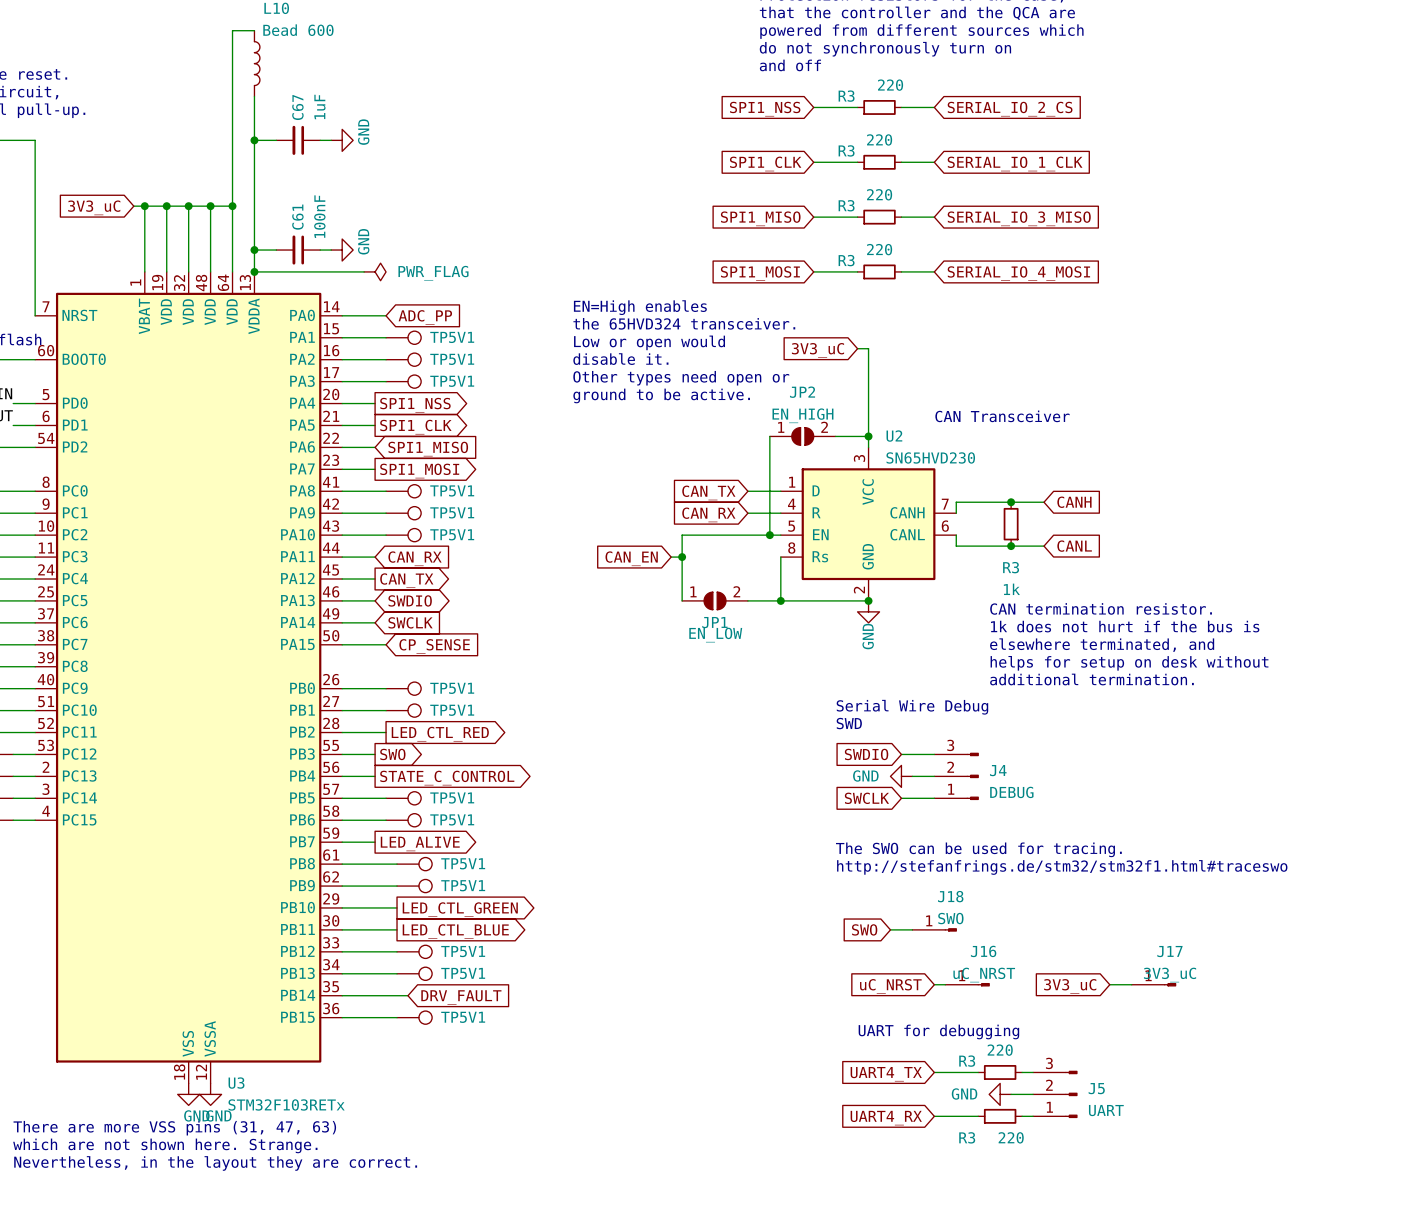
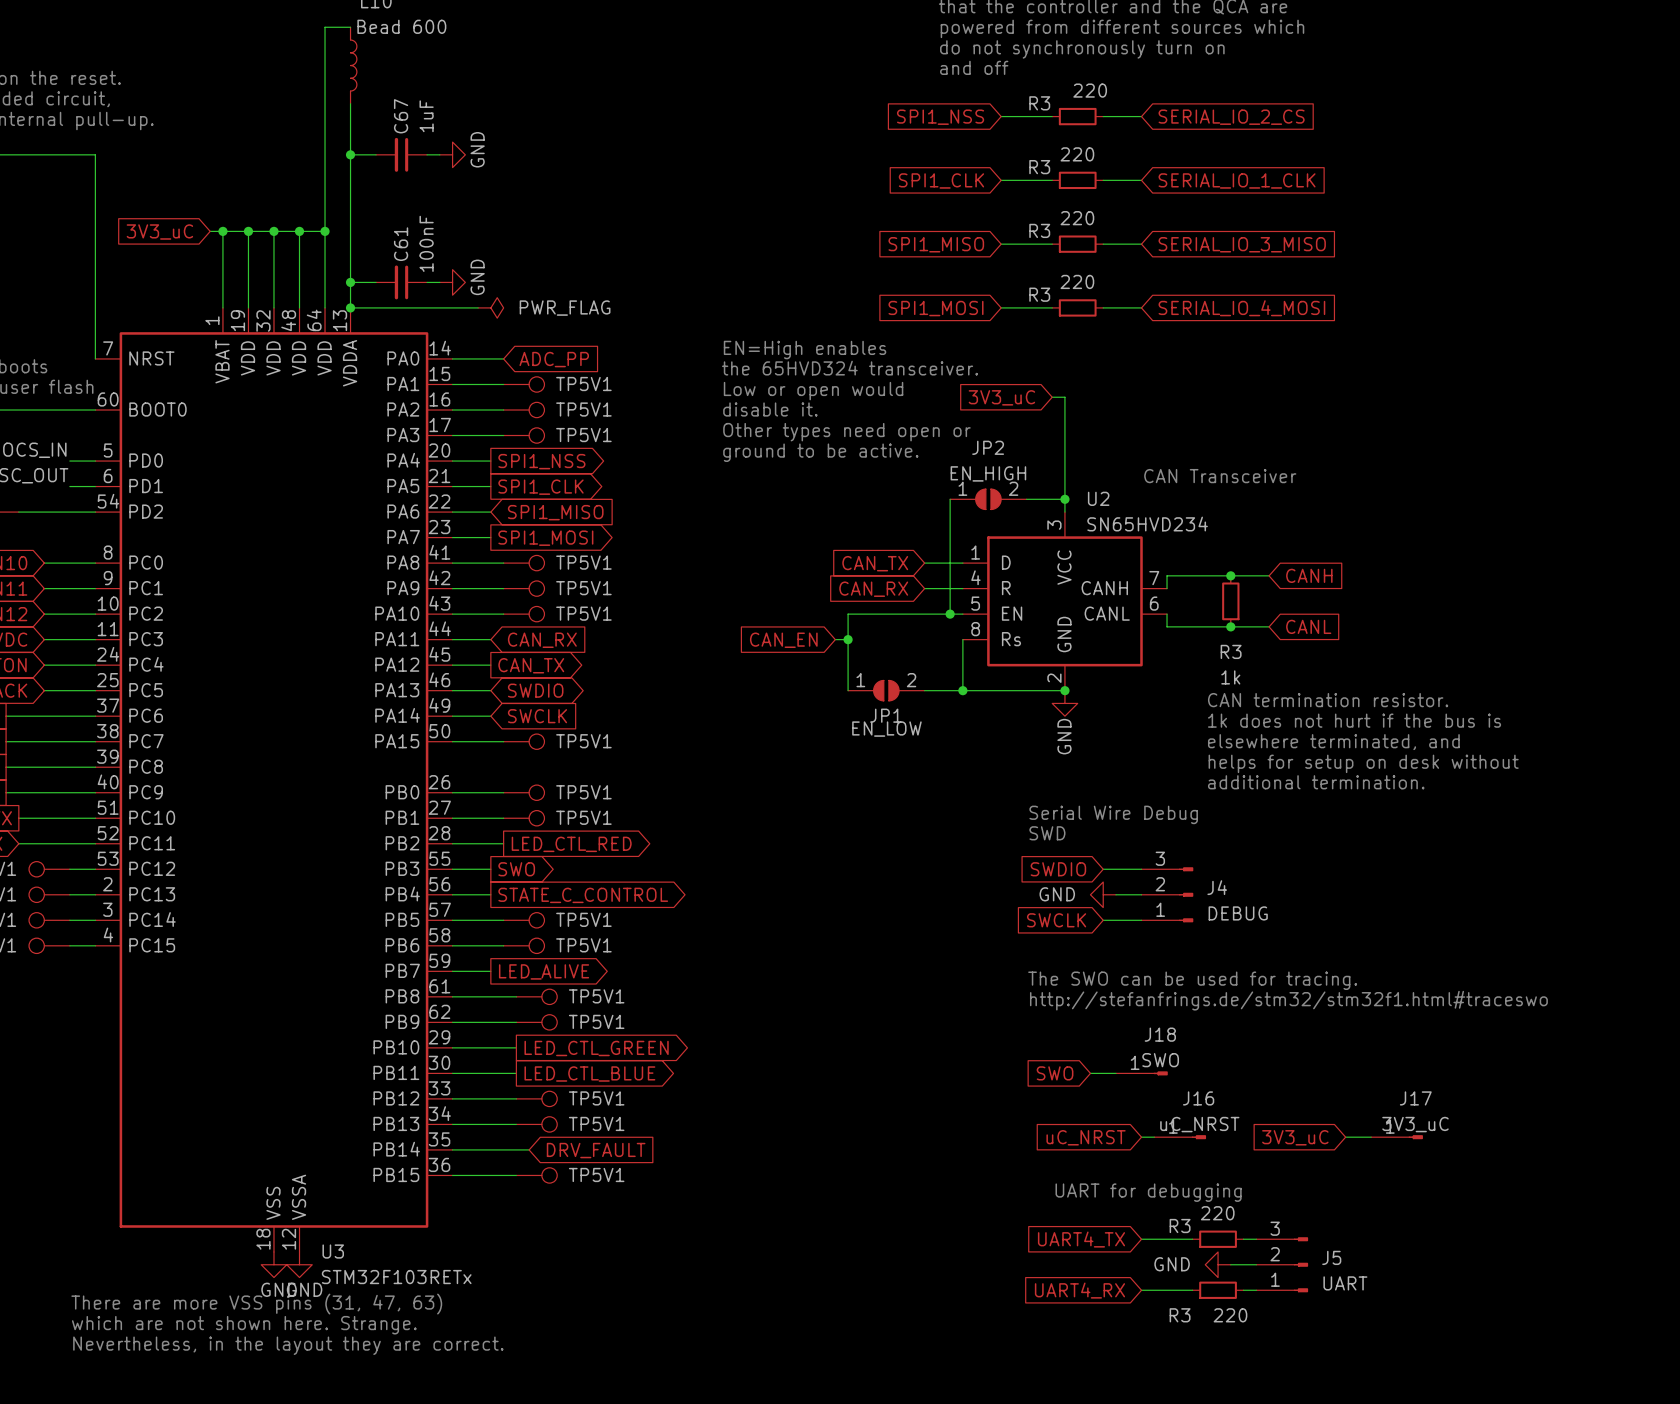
U2 value: SN65HVD230 (930, 457) -> SN65HVD234 (1147, 524)
TP5V1: none -> (524, 741)
global label: CP_SENSE (434, 646) -> none

